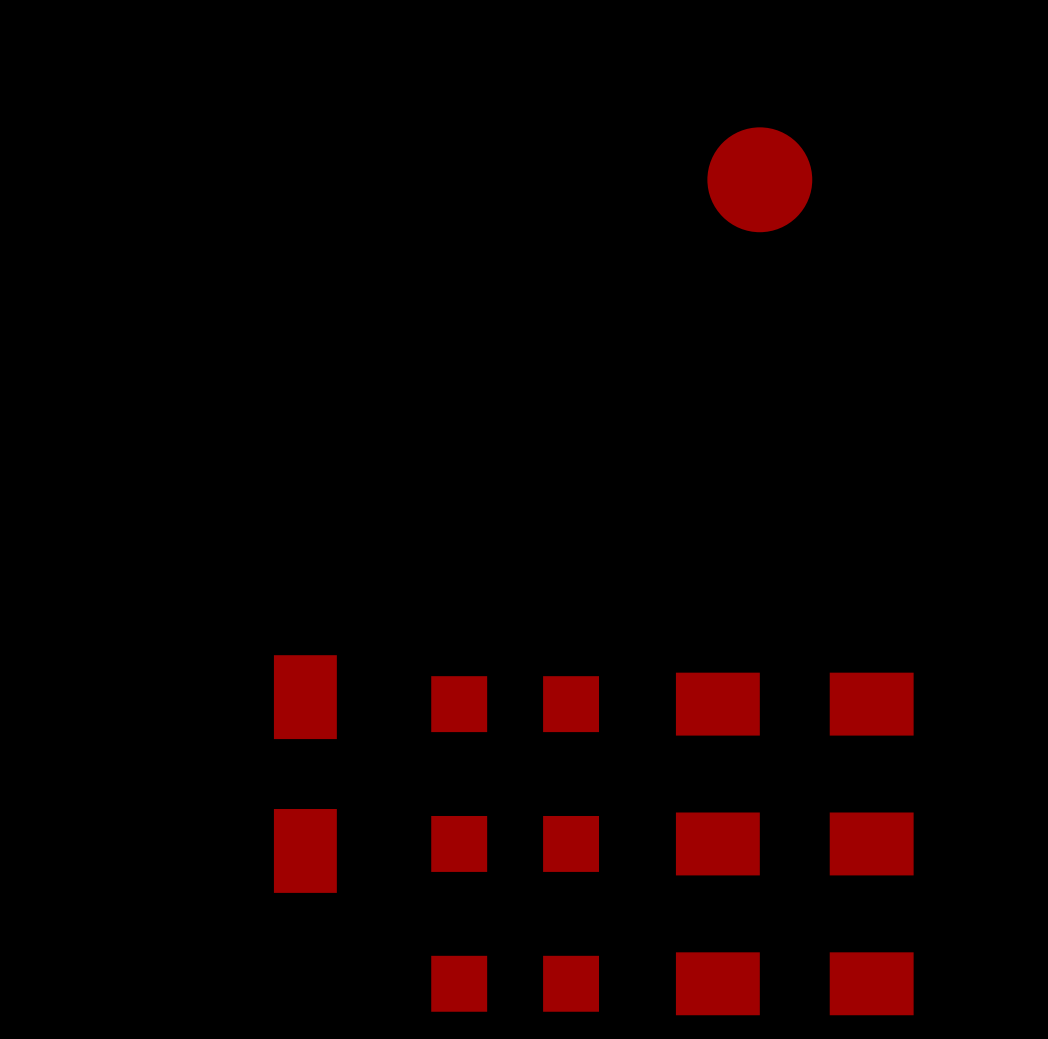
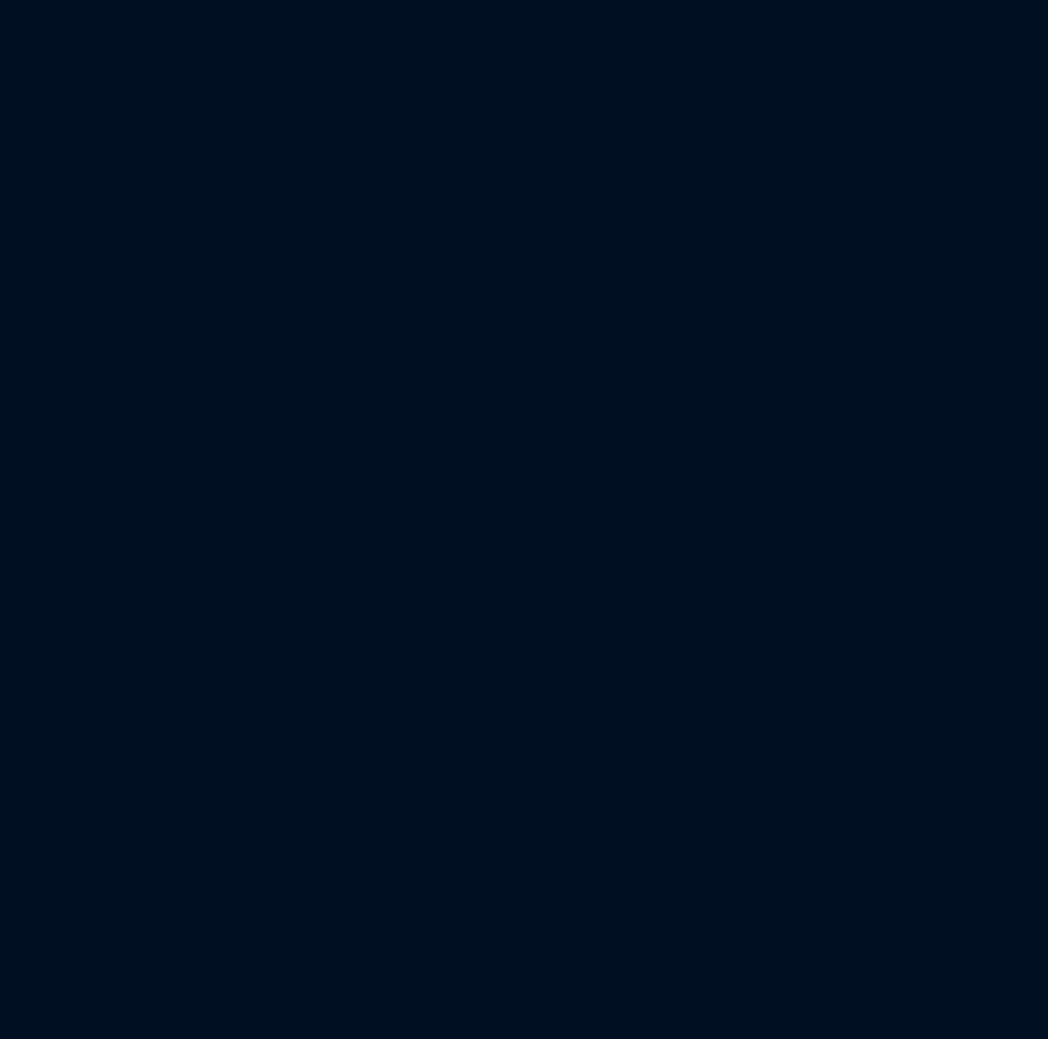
part: (759, 179) -> none
part: (515, 704) -> none
part: (794, 704) -> none
part: (305, 774) -> none
part: (515, 843) -> none
part: (794, 843) -> none
part: (515, 983) -> none
part: (794, 983) -> none

